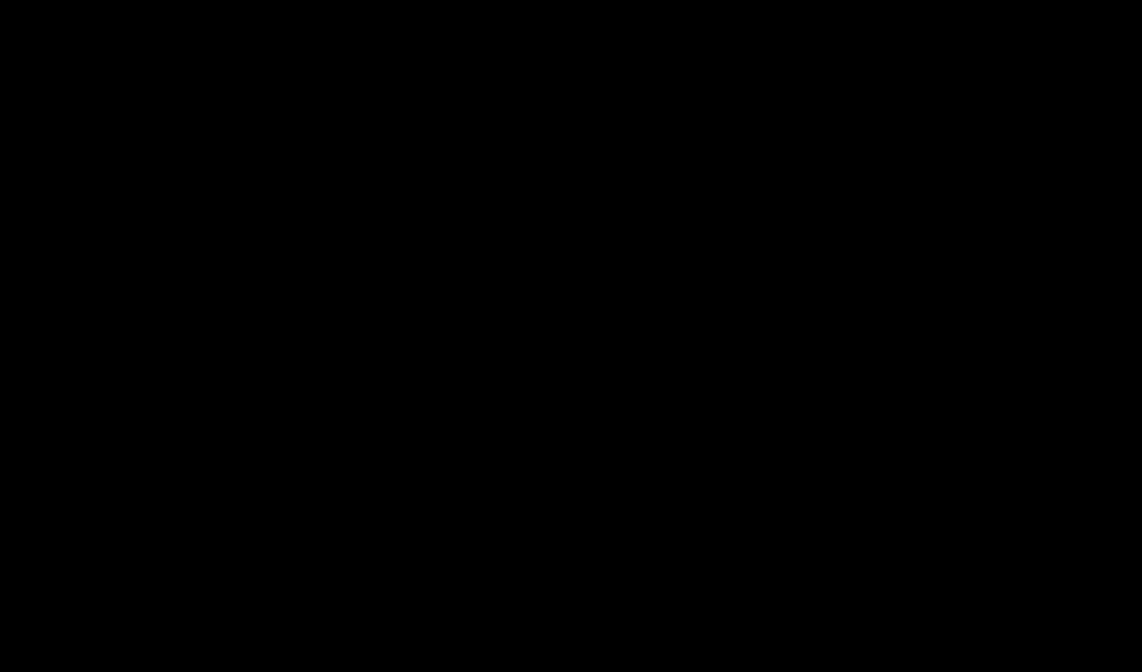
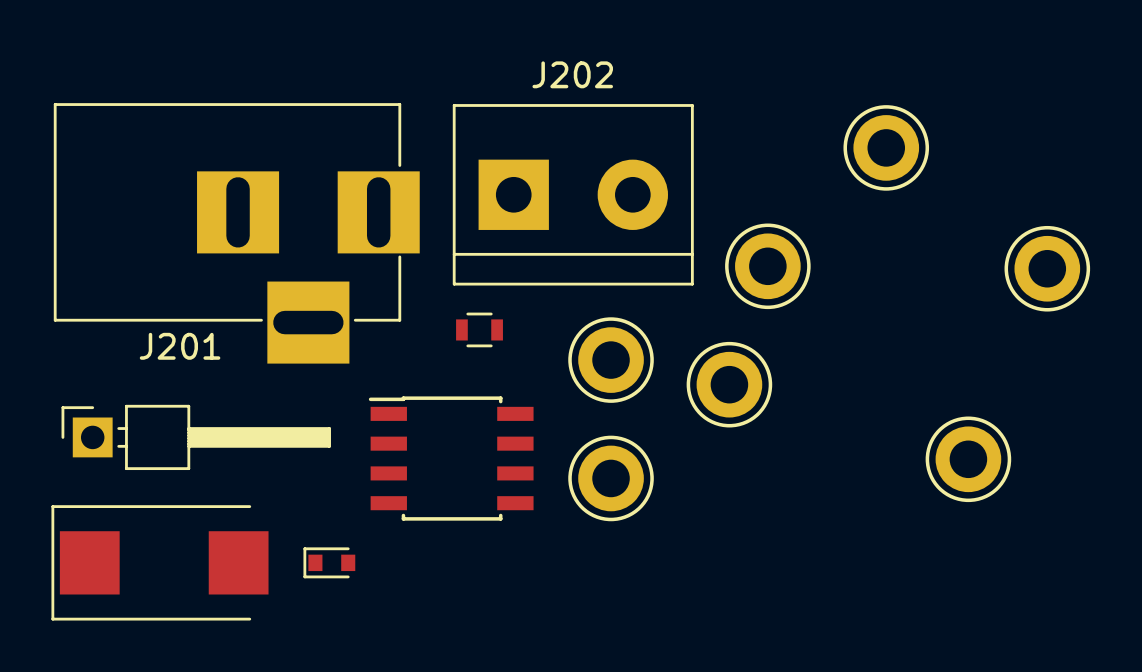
part: none -> (886, 147)
J202: none -> (573, 194)
J201: none -> (236, 233)
part: none -> (767, 266)
part: none -> (1047, 268)
part: none -> (479, 329)
part: none -> (611, 360)
part: none -> (729, 384)
part: none -> (196, 437)
part: none -> (451, 458)
part: none -> (968, 459)
part: none -> (611, 478)
part: none -> (159, 562)
part: none -> (329, 562)

